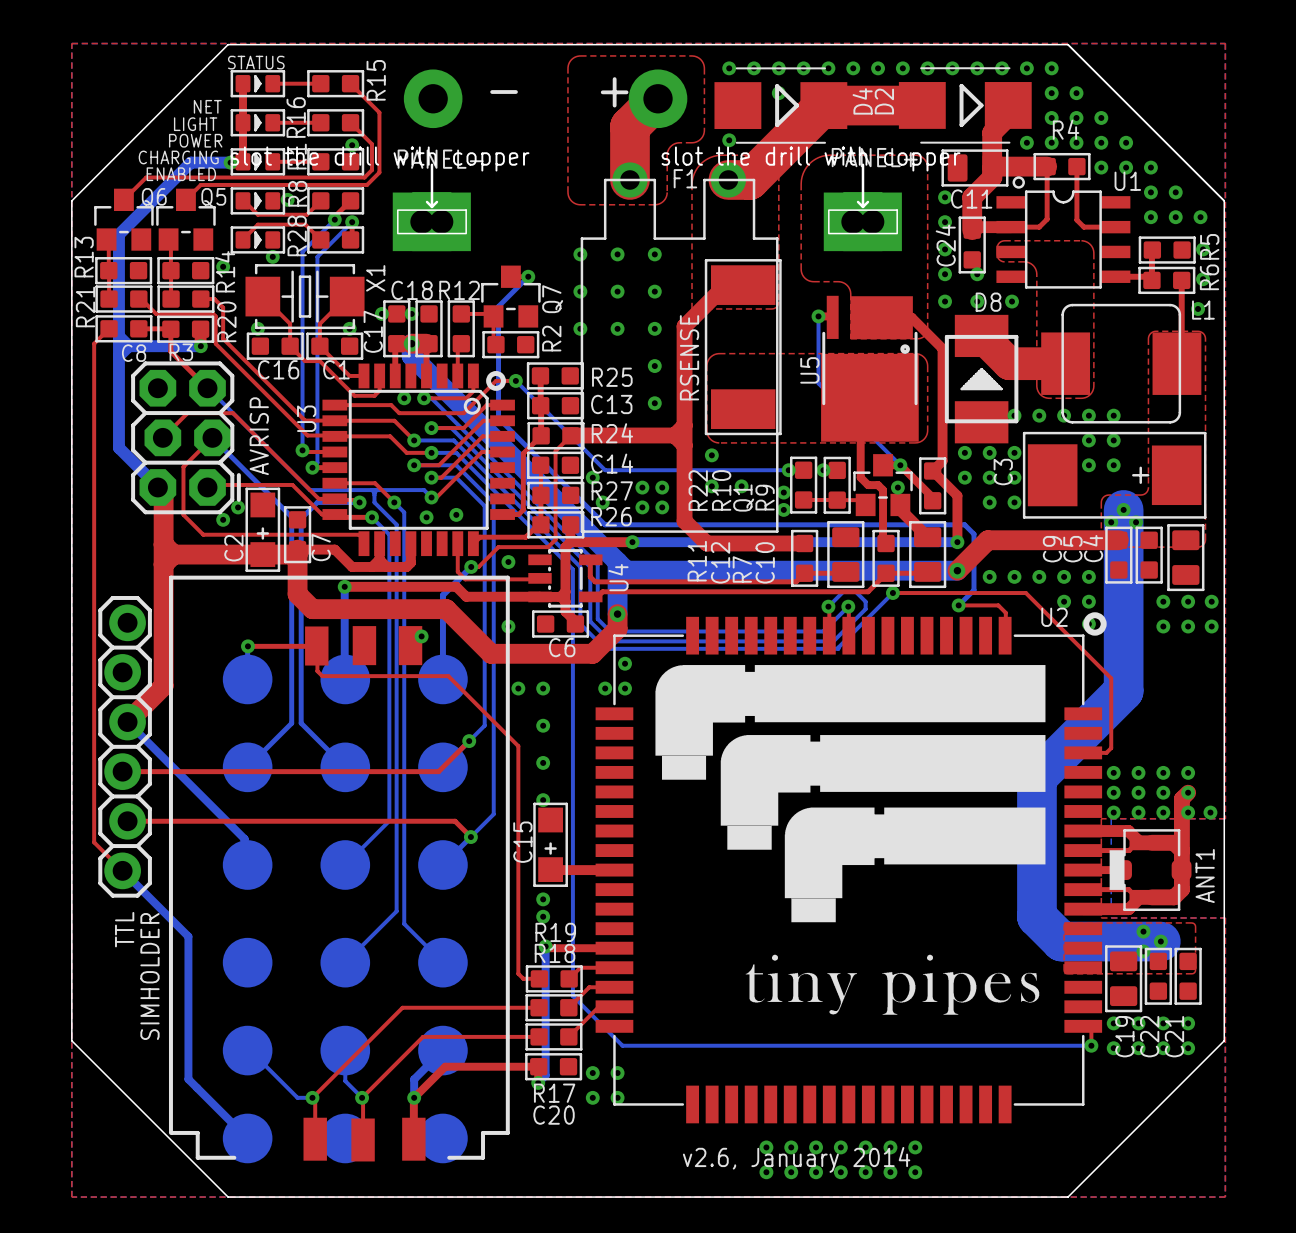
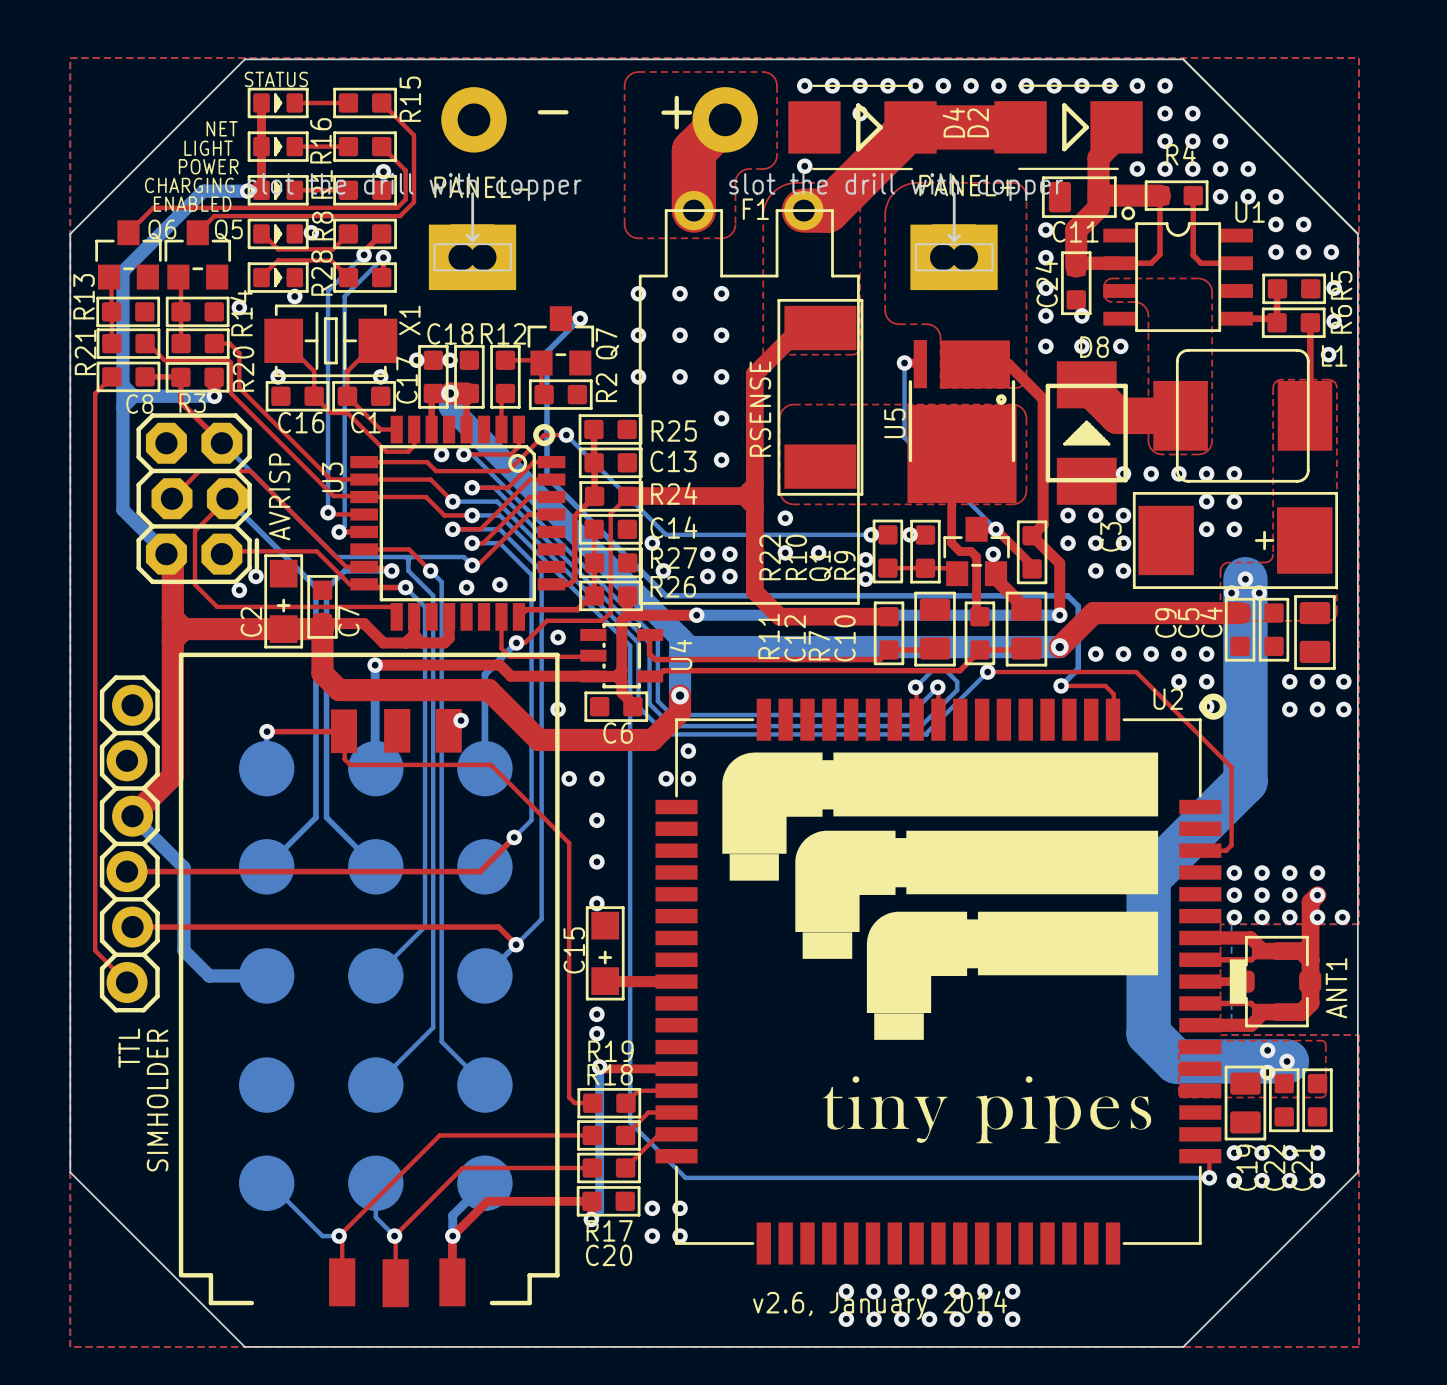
bottom track: (127, 722) (244, 838) (244, 861) (247, 865) -> (132, 816) (183, 867) (183, 950) (209, 975) (266, 975)
bottom track: (122, 870) (188, 936) (188, 1079) (247, 1138) -> none
part: (247, 1138) -> none
part: (345, 1138) -> none
part: (442, 1138) -> none

